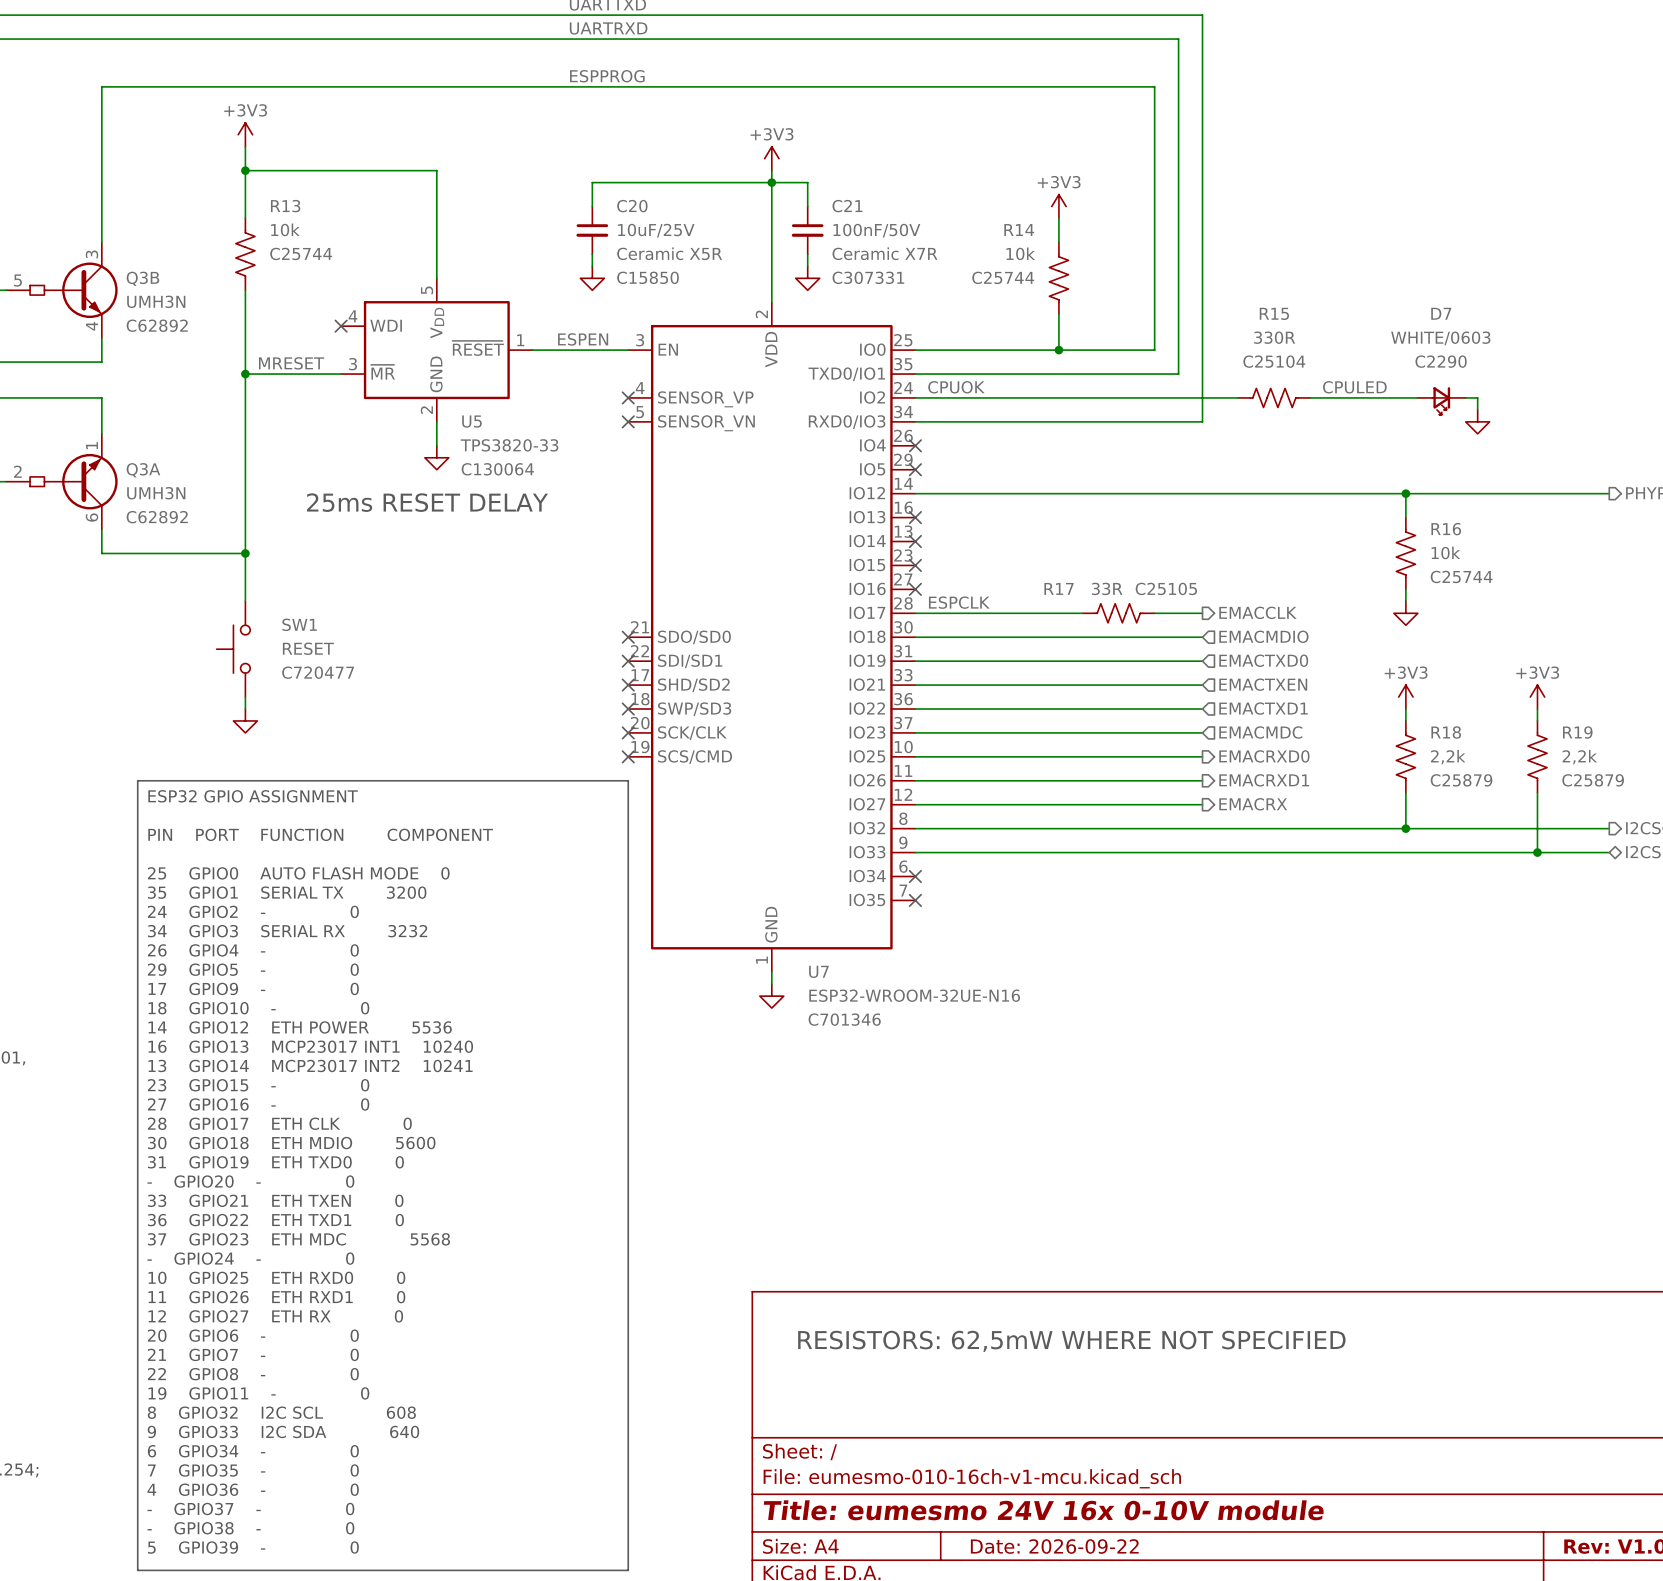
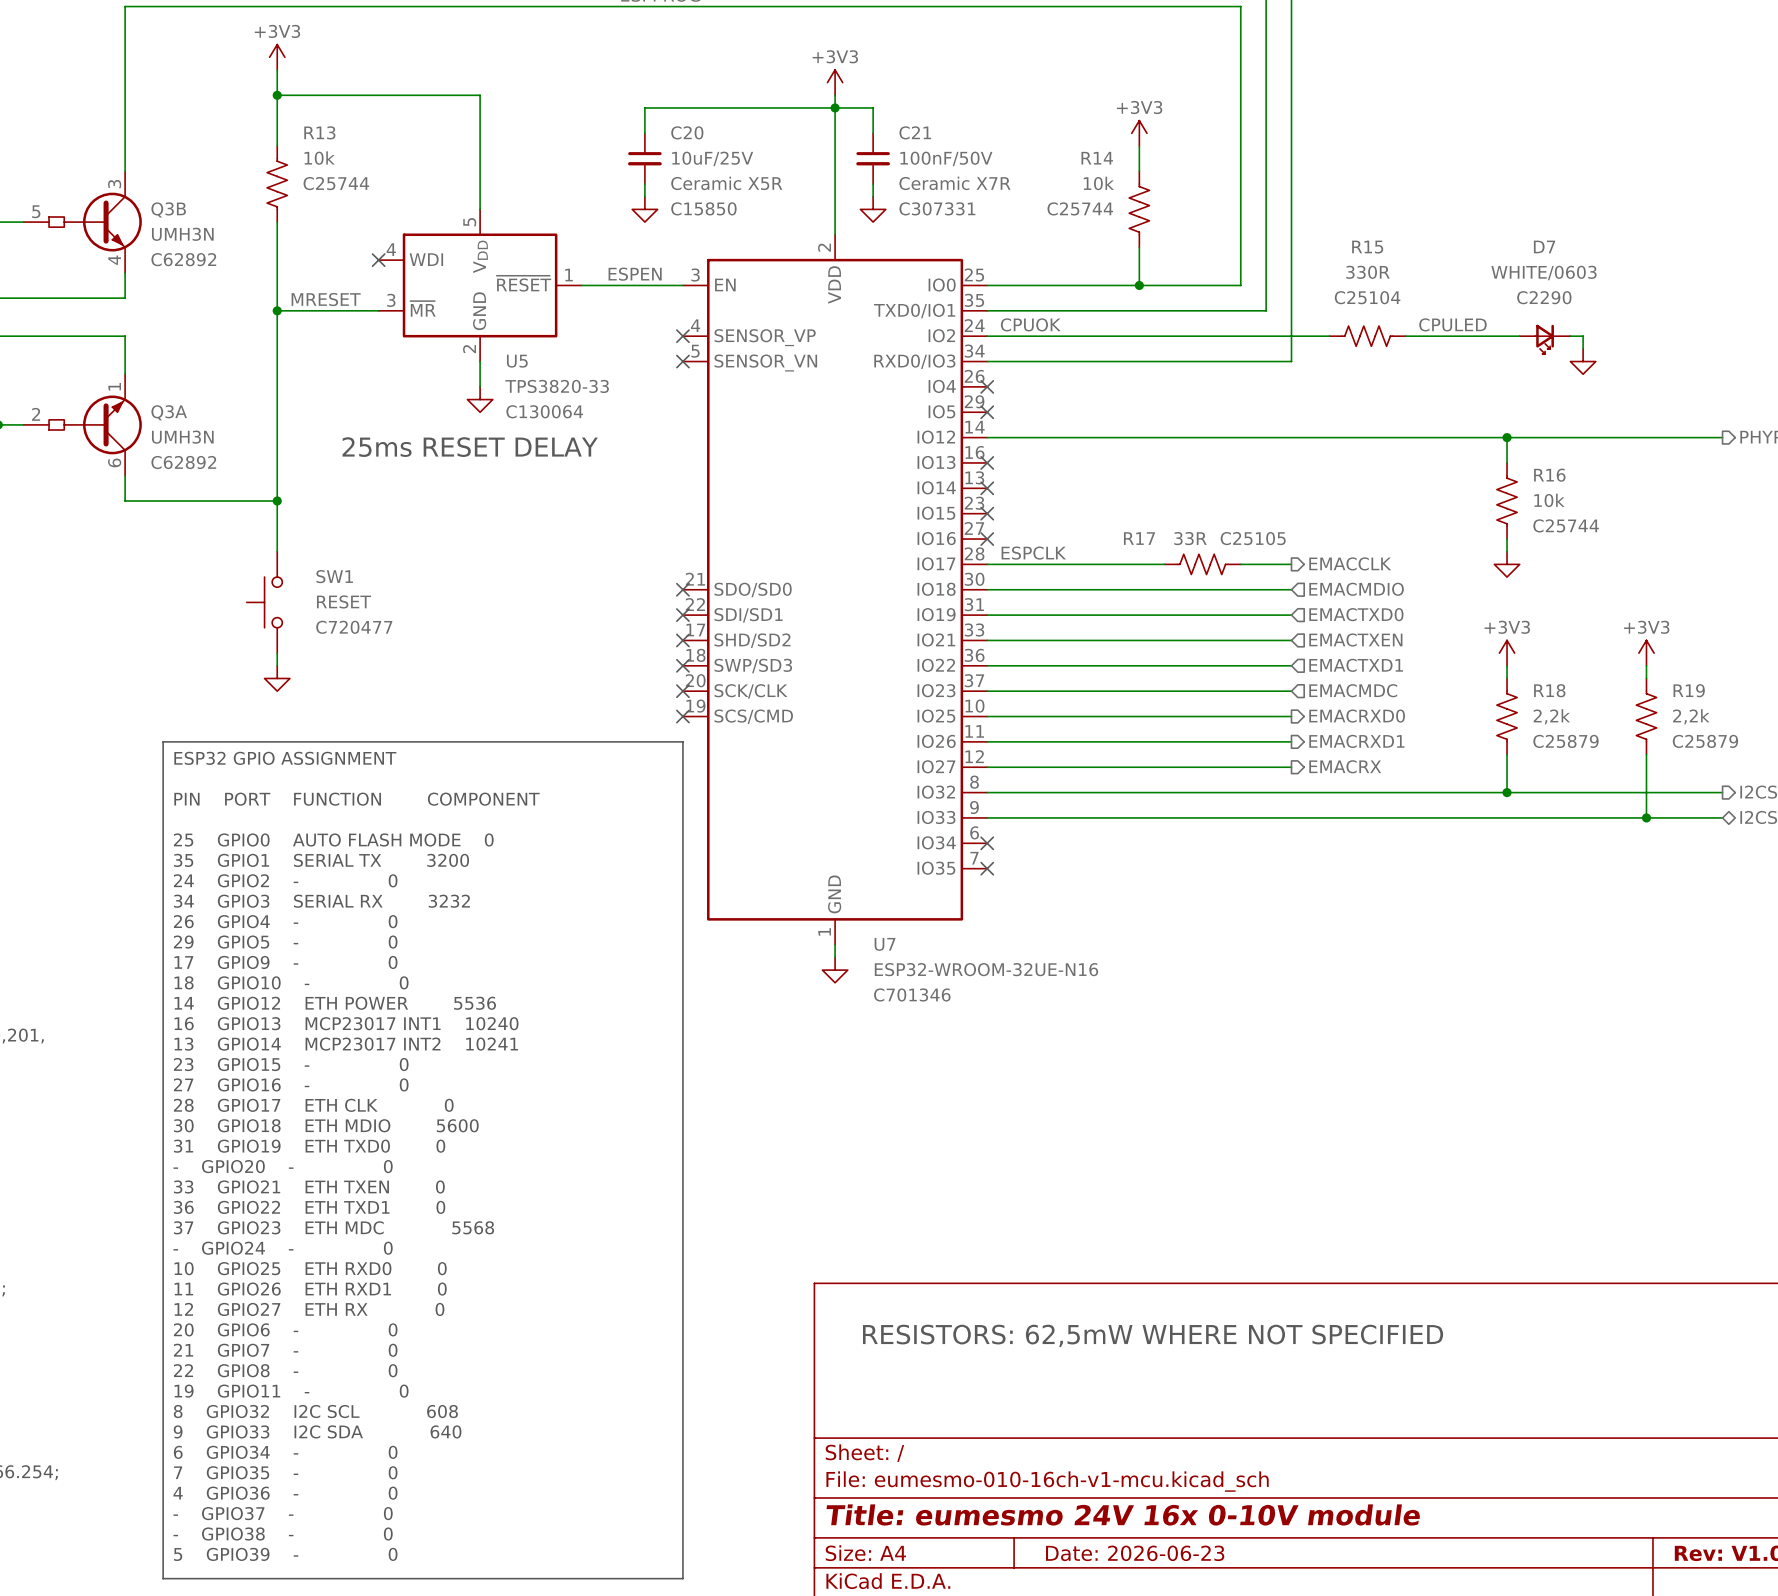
title block: Date: 2026-09-22 (1054, 1546) -> Date: 2026-06-23 (1135, 1553)

